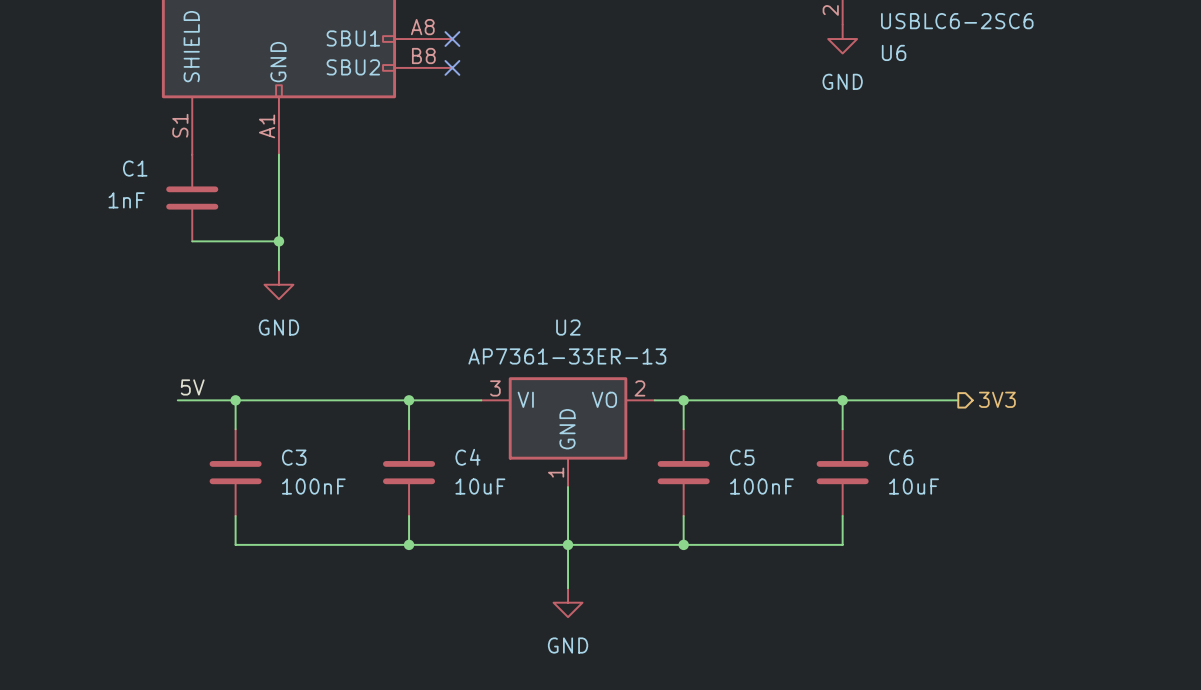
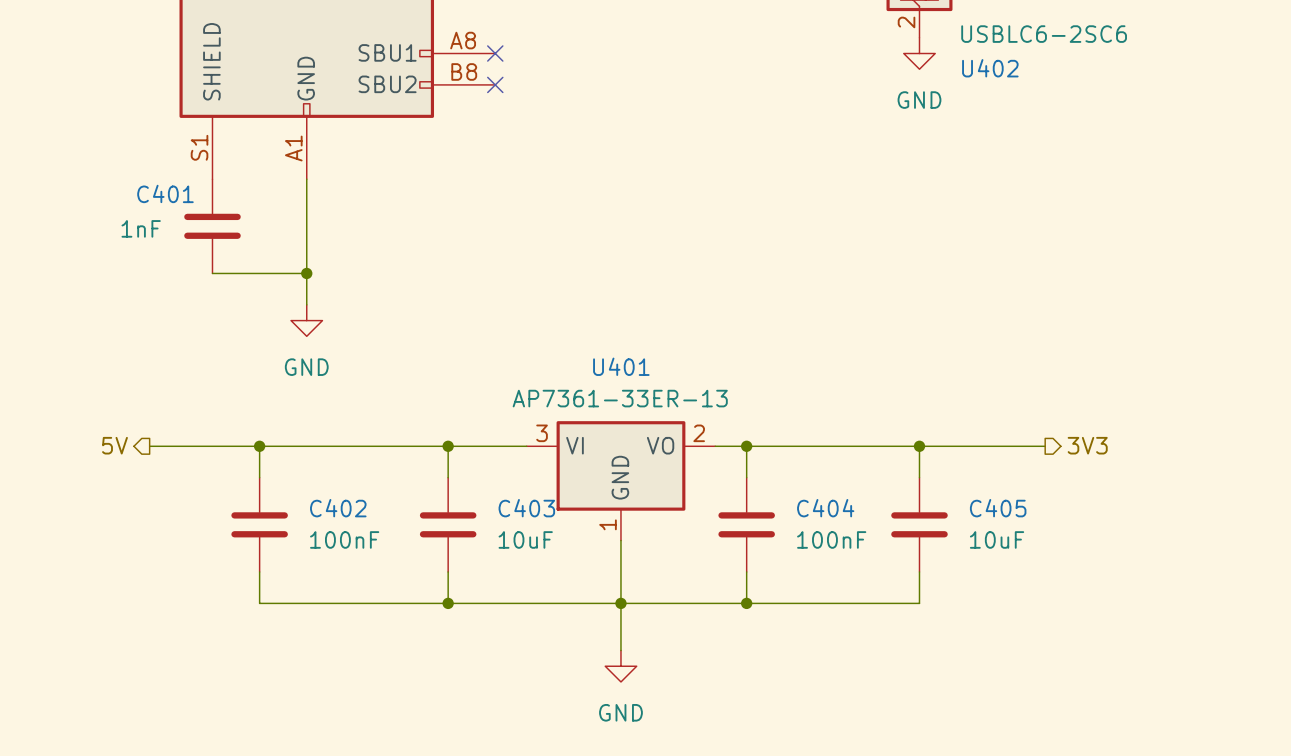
U6 name: U6 (894, 52) -> U402 (990, 68)
C1 name: C1 (135, 168) -> C401 (165, 193)
U2 name: U2 (568, 327) -> U401 (621, 366)
label: 5V (192, 387) -> none
hierarchical label: none -> 5V (114, 445)
wire: none -> (149, 446) (196, 446)
C3 name: C3 (294, 457) -> C402 (338, 508)
C4 name: C4 (468, 457) -> C403 (526, 508)
C5 name: C5 (742, 457) -> C404 (825, 508)
C6 name: C6 (901, 457) -> C405 (998, 508)

